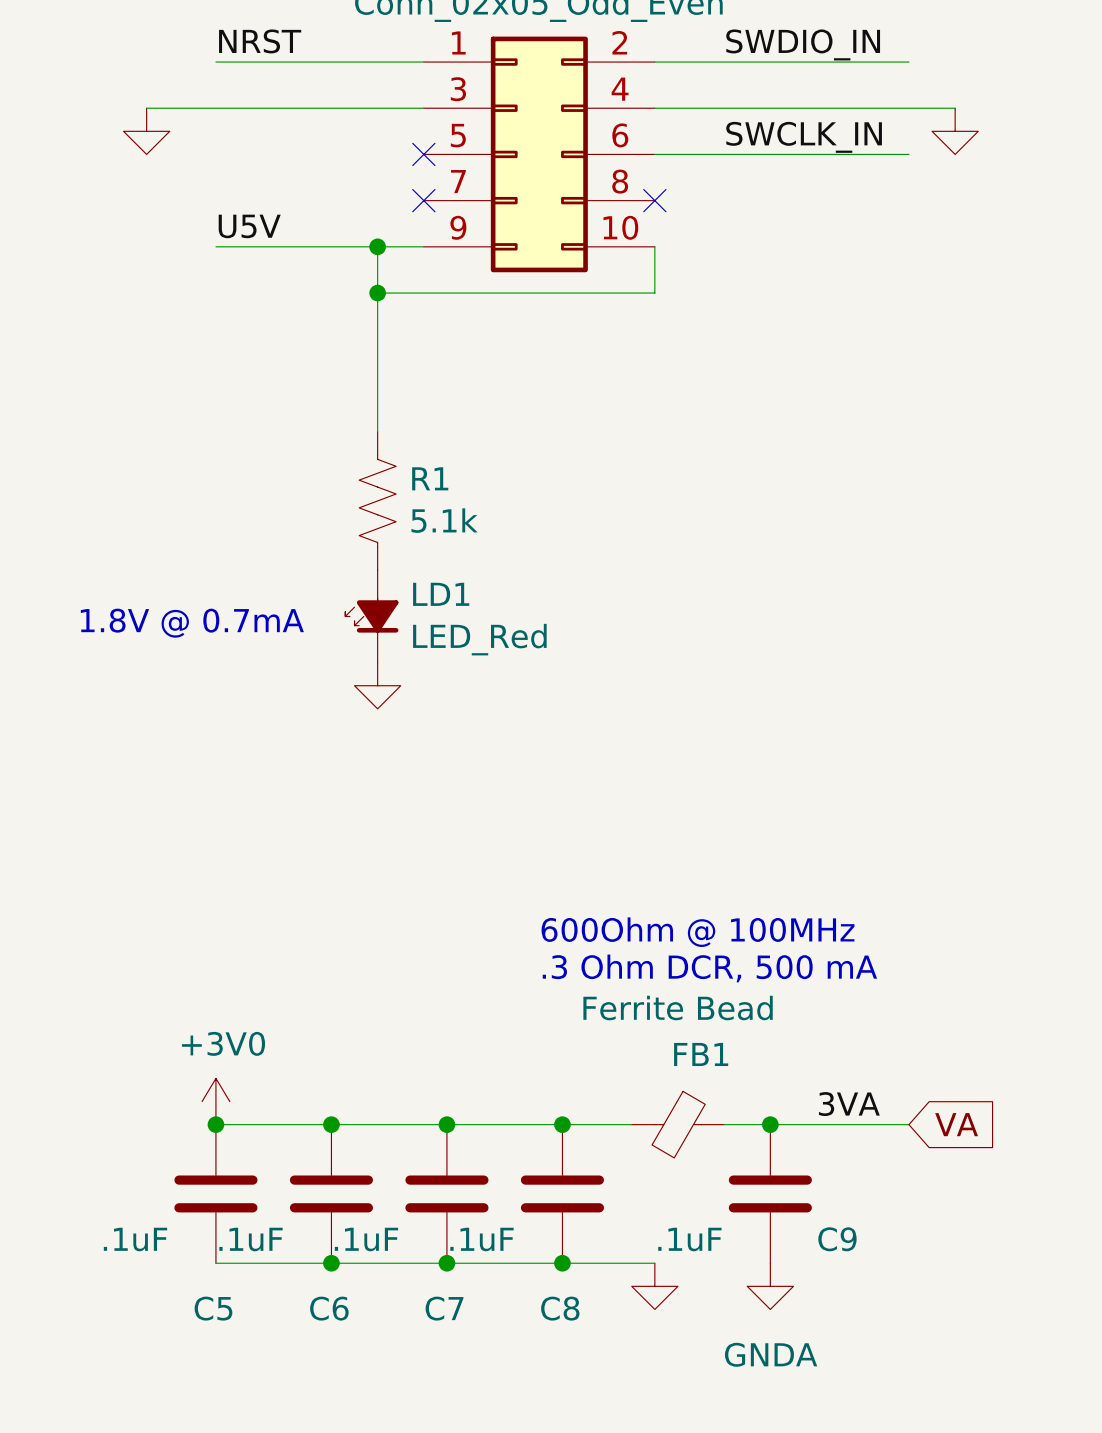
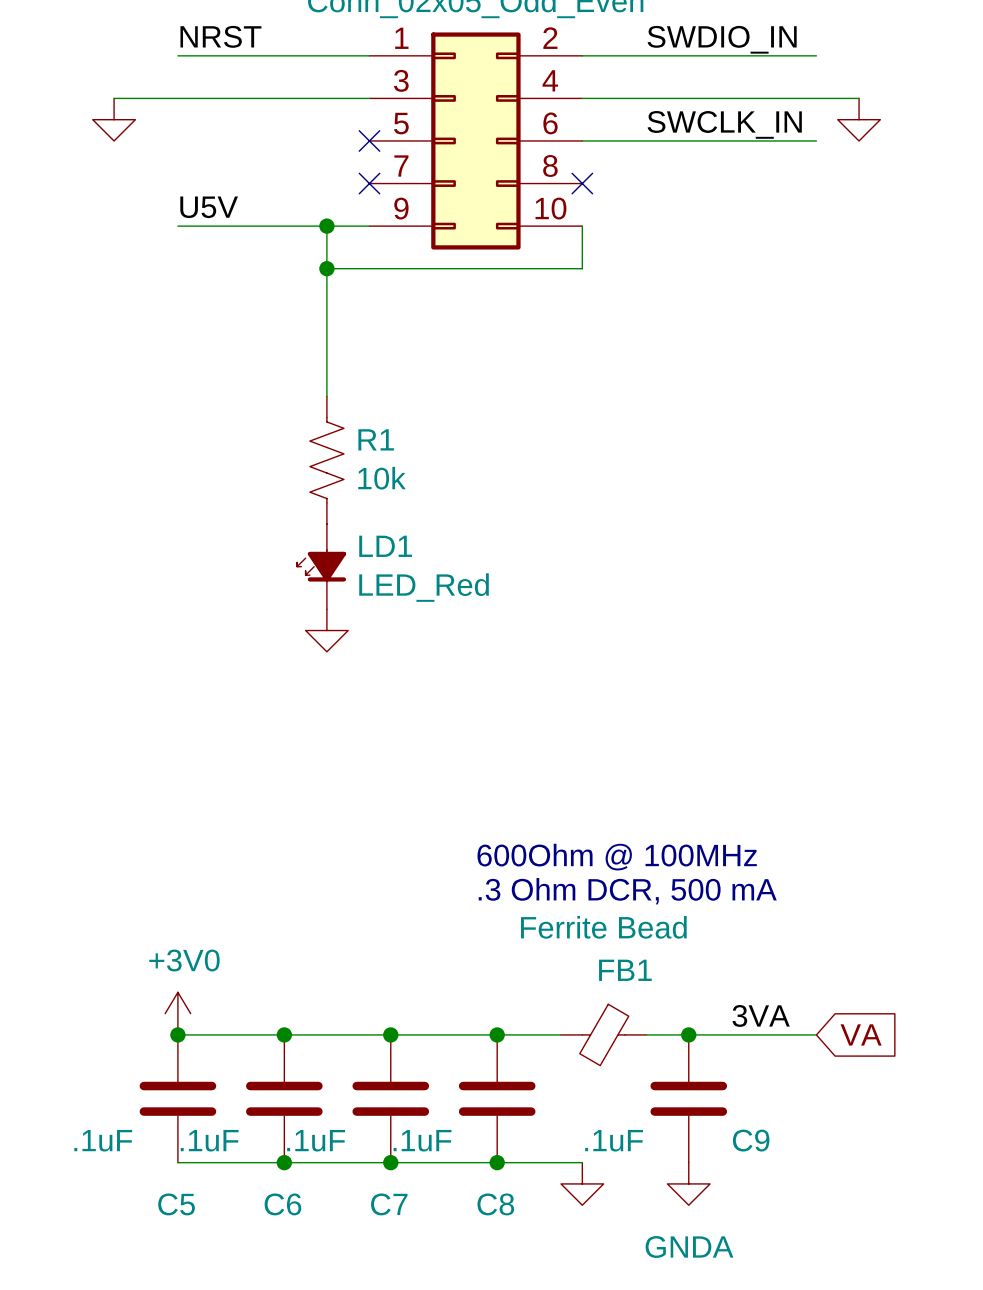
R1 value: 5.1k (444, 520) -> 10k (382, 478)
text: 1.8V @ 0.7mA (192, 623) -> none

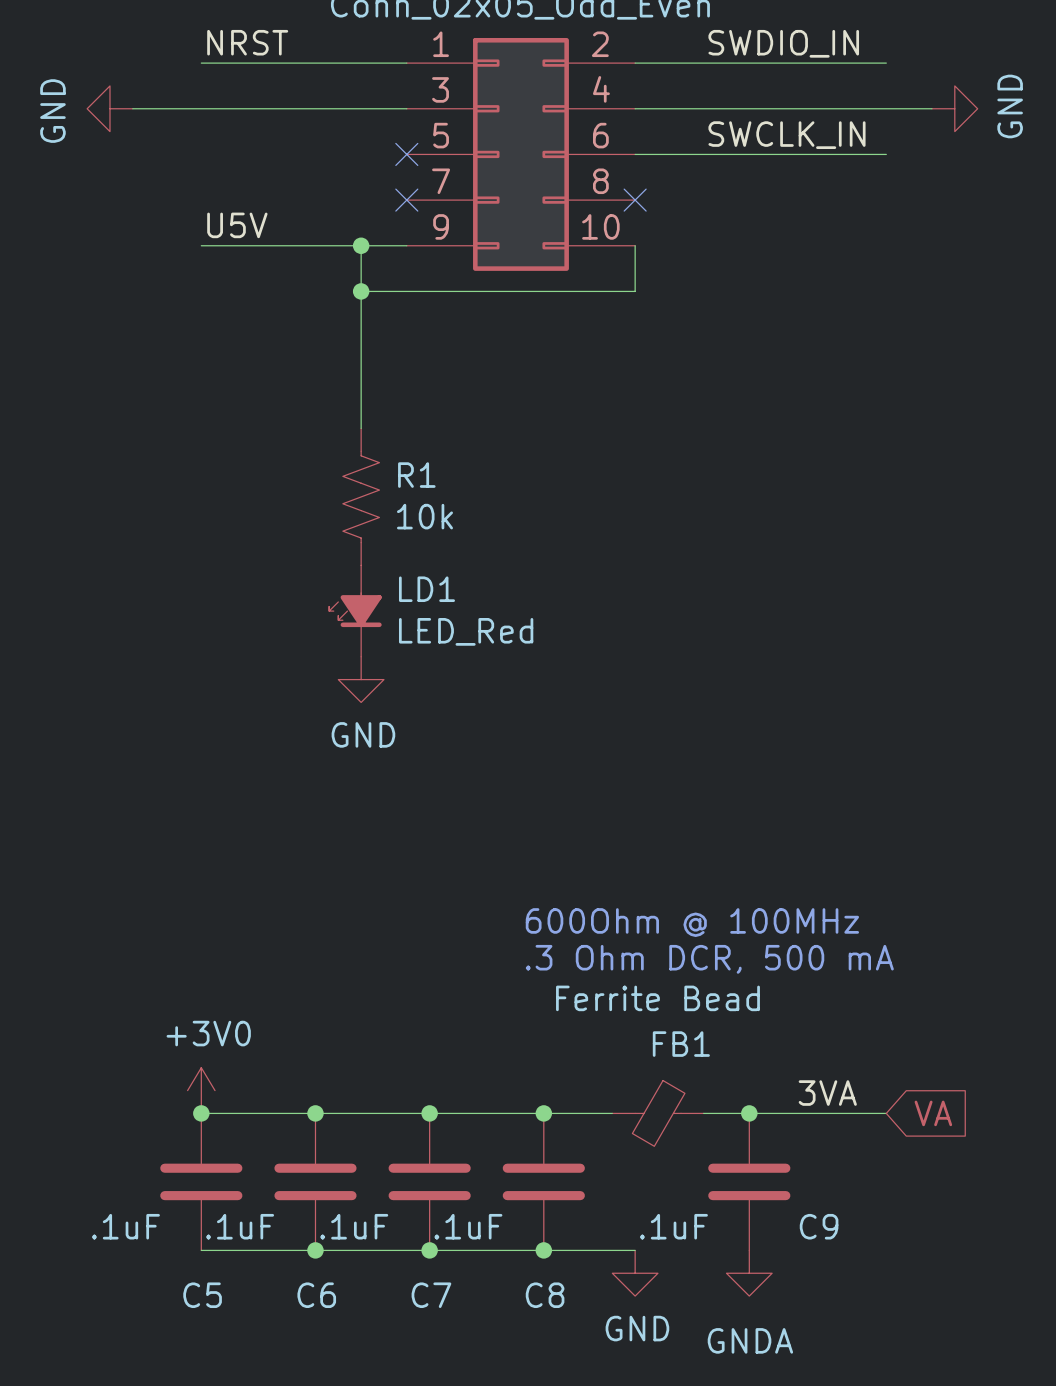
power symbol: none -> GND (109, 108)
power symbol: none -> GND (954, 108)
power symbol: (114, 119) -> none
power symbol: (859, 119) -> none
power symbol text: none -> GND (363, 734)
power symbol text: none -> GND (637, 1328)

